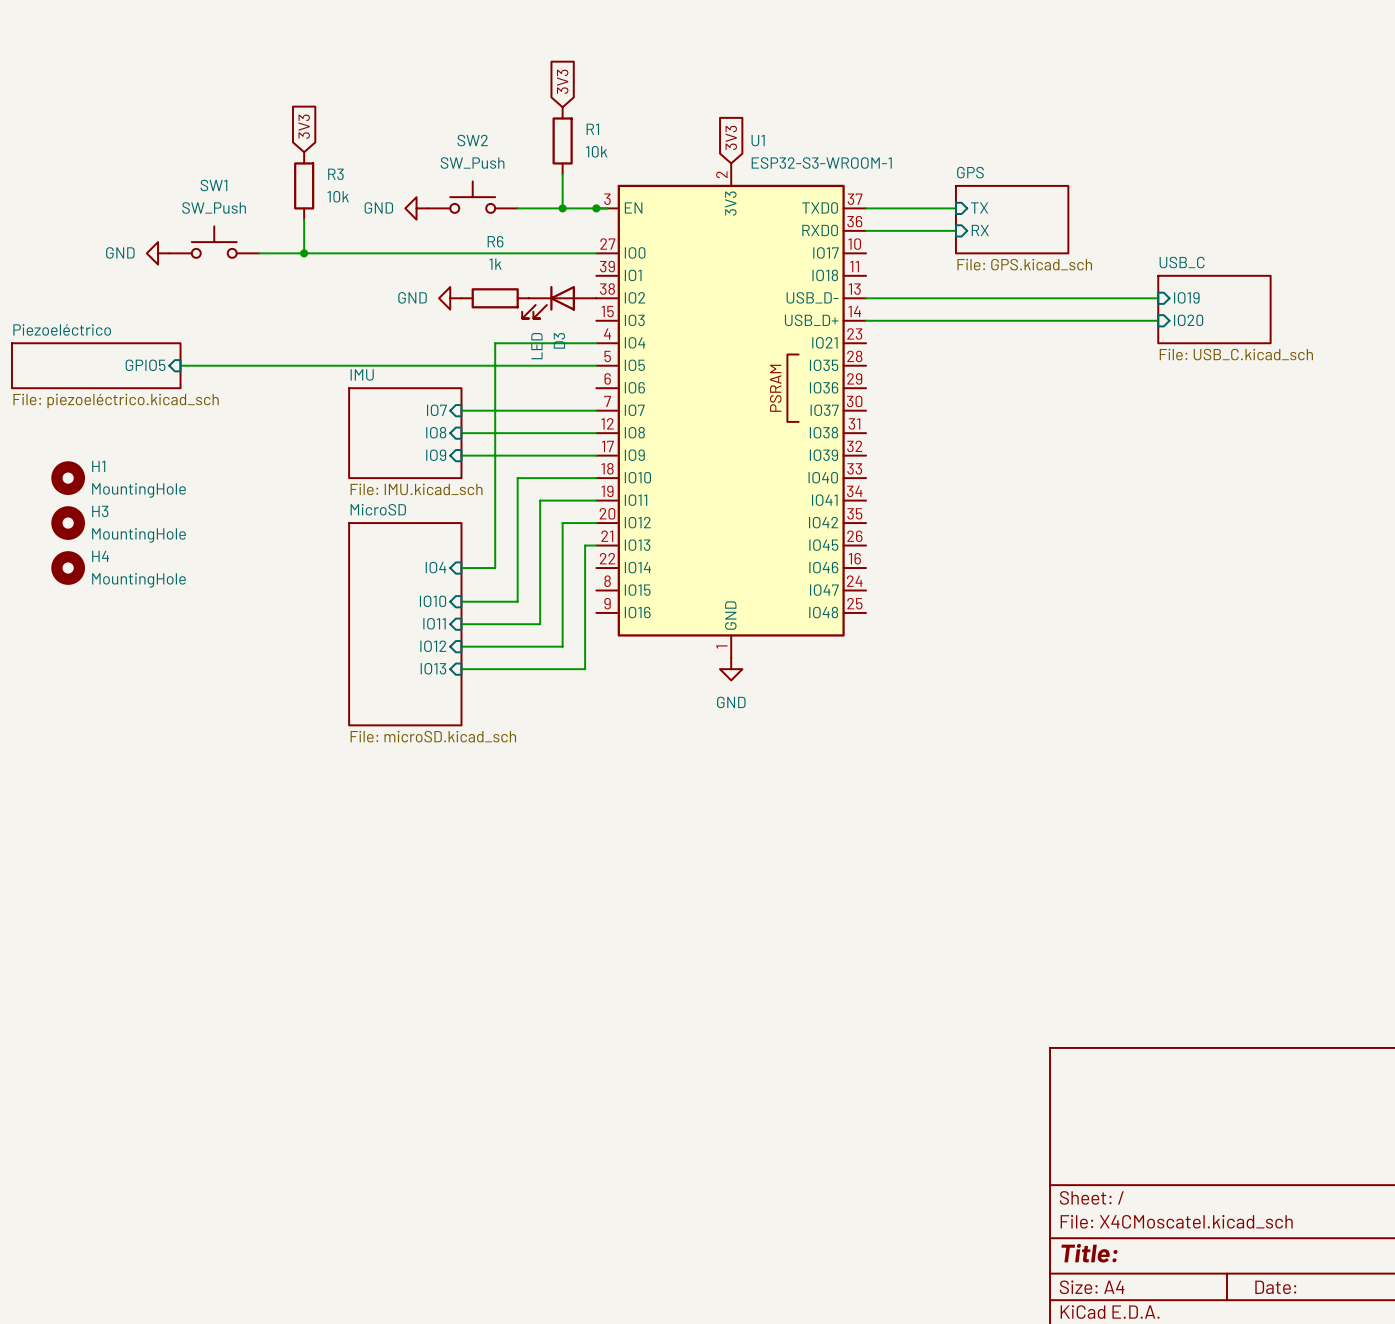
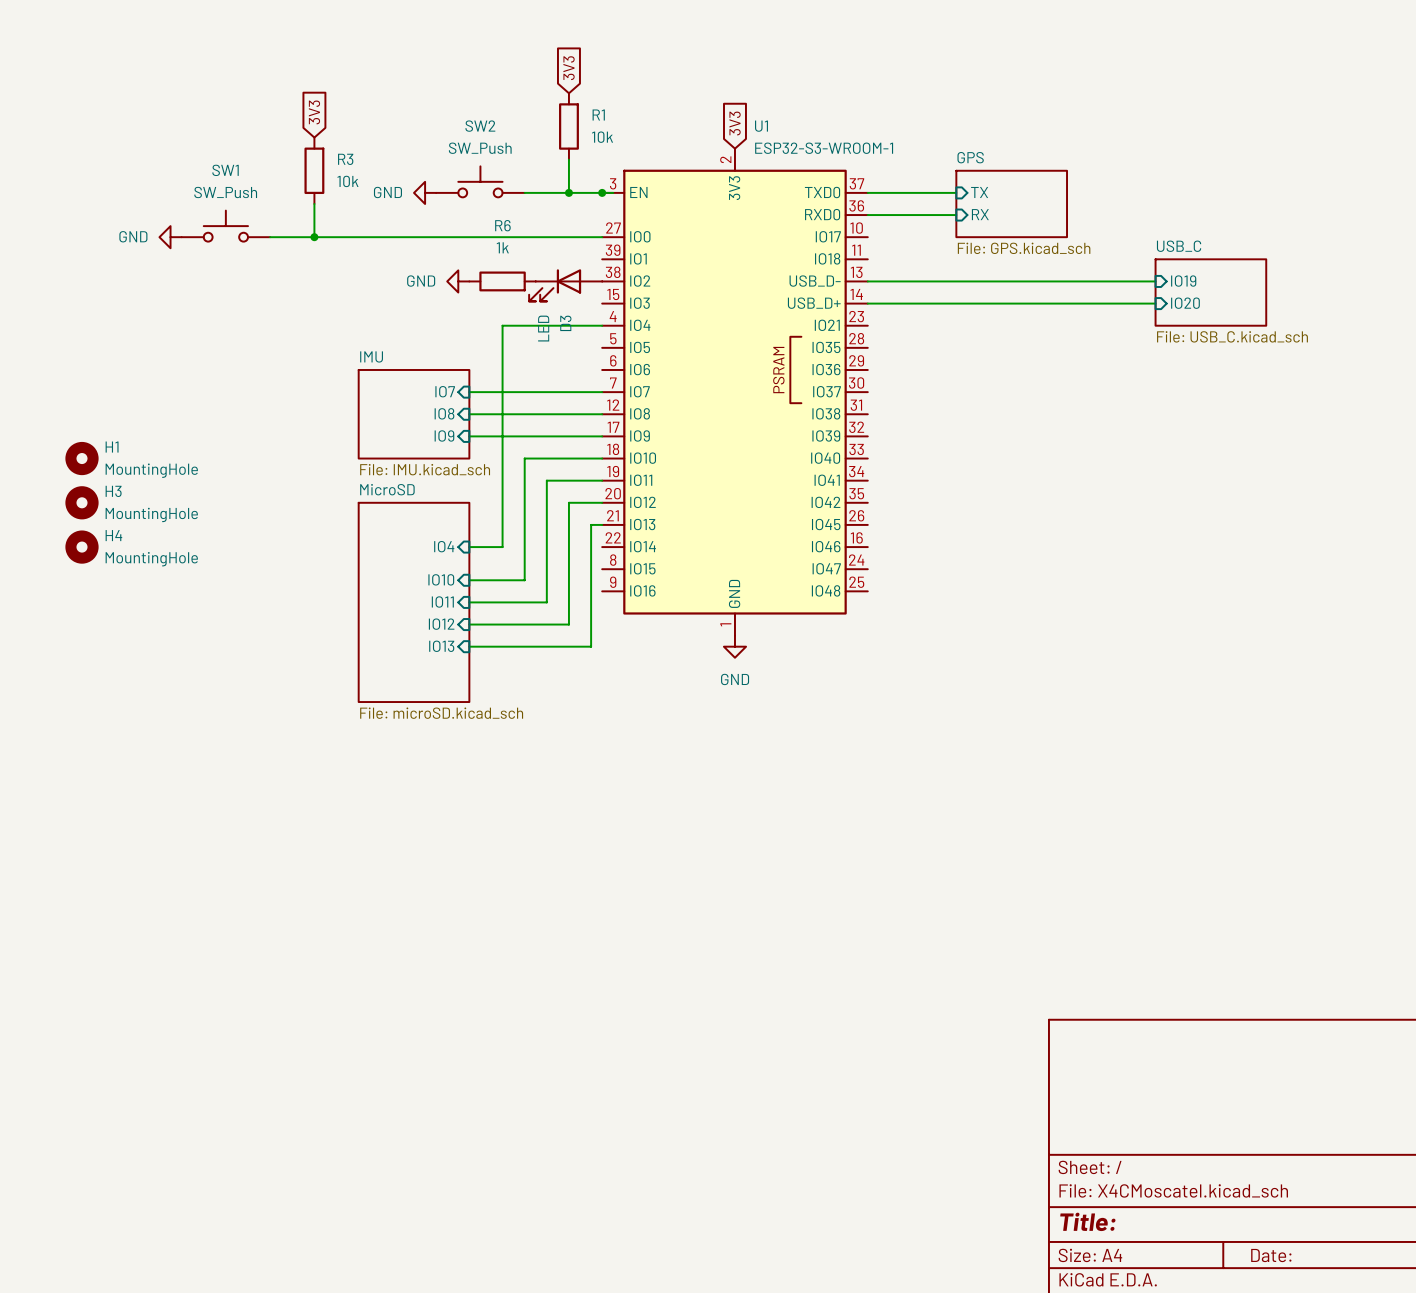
sheet Piezoeléctrico: File: piezoeléctrico.kicad_sch (96, 365) -> none
sheet pin: GPIO5 (145, 365) -> none
wire: (180, 365) (596, 365) -> none

